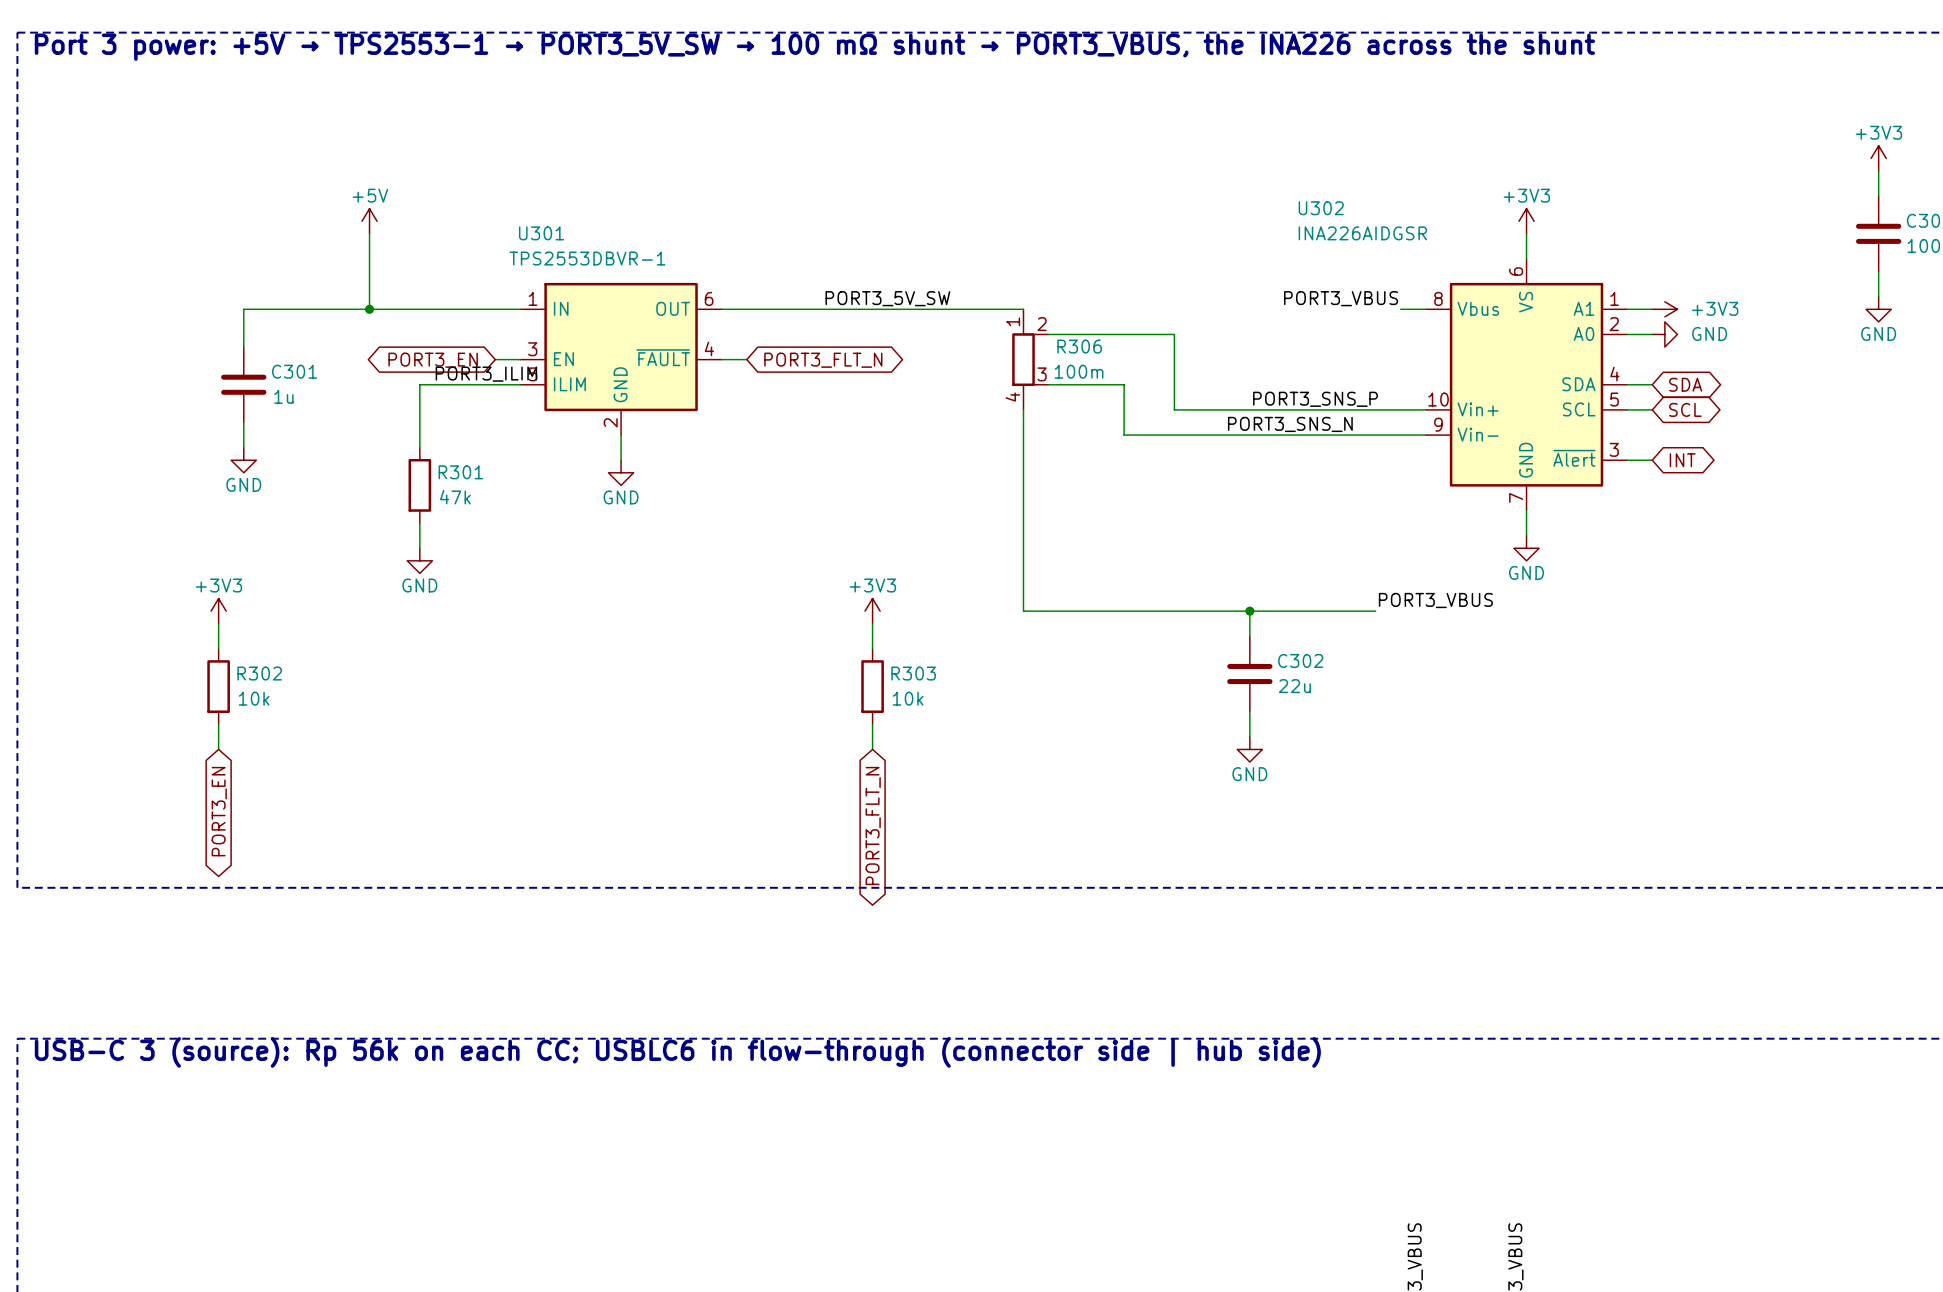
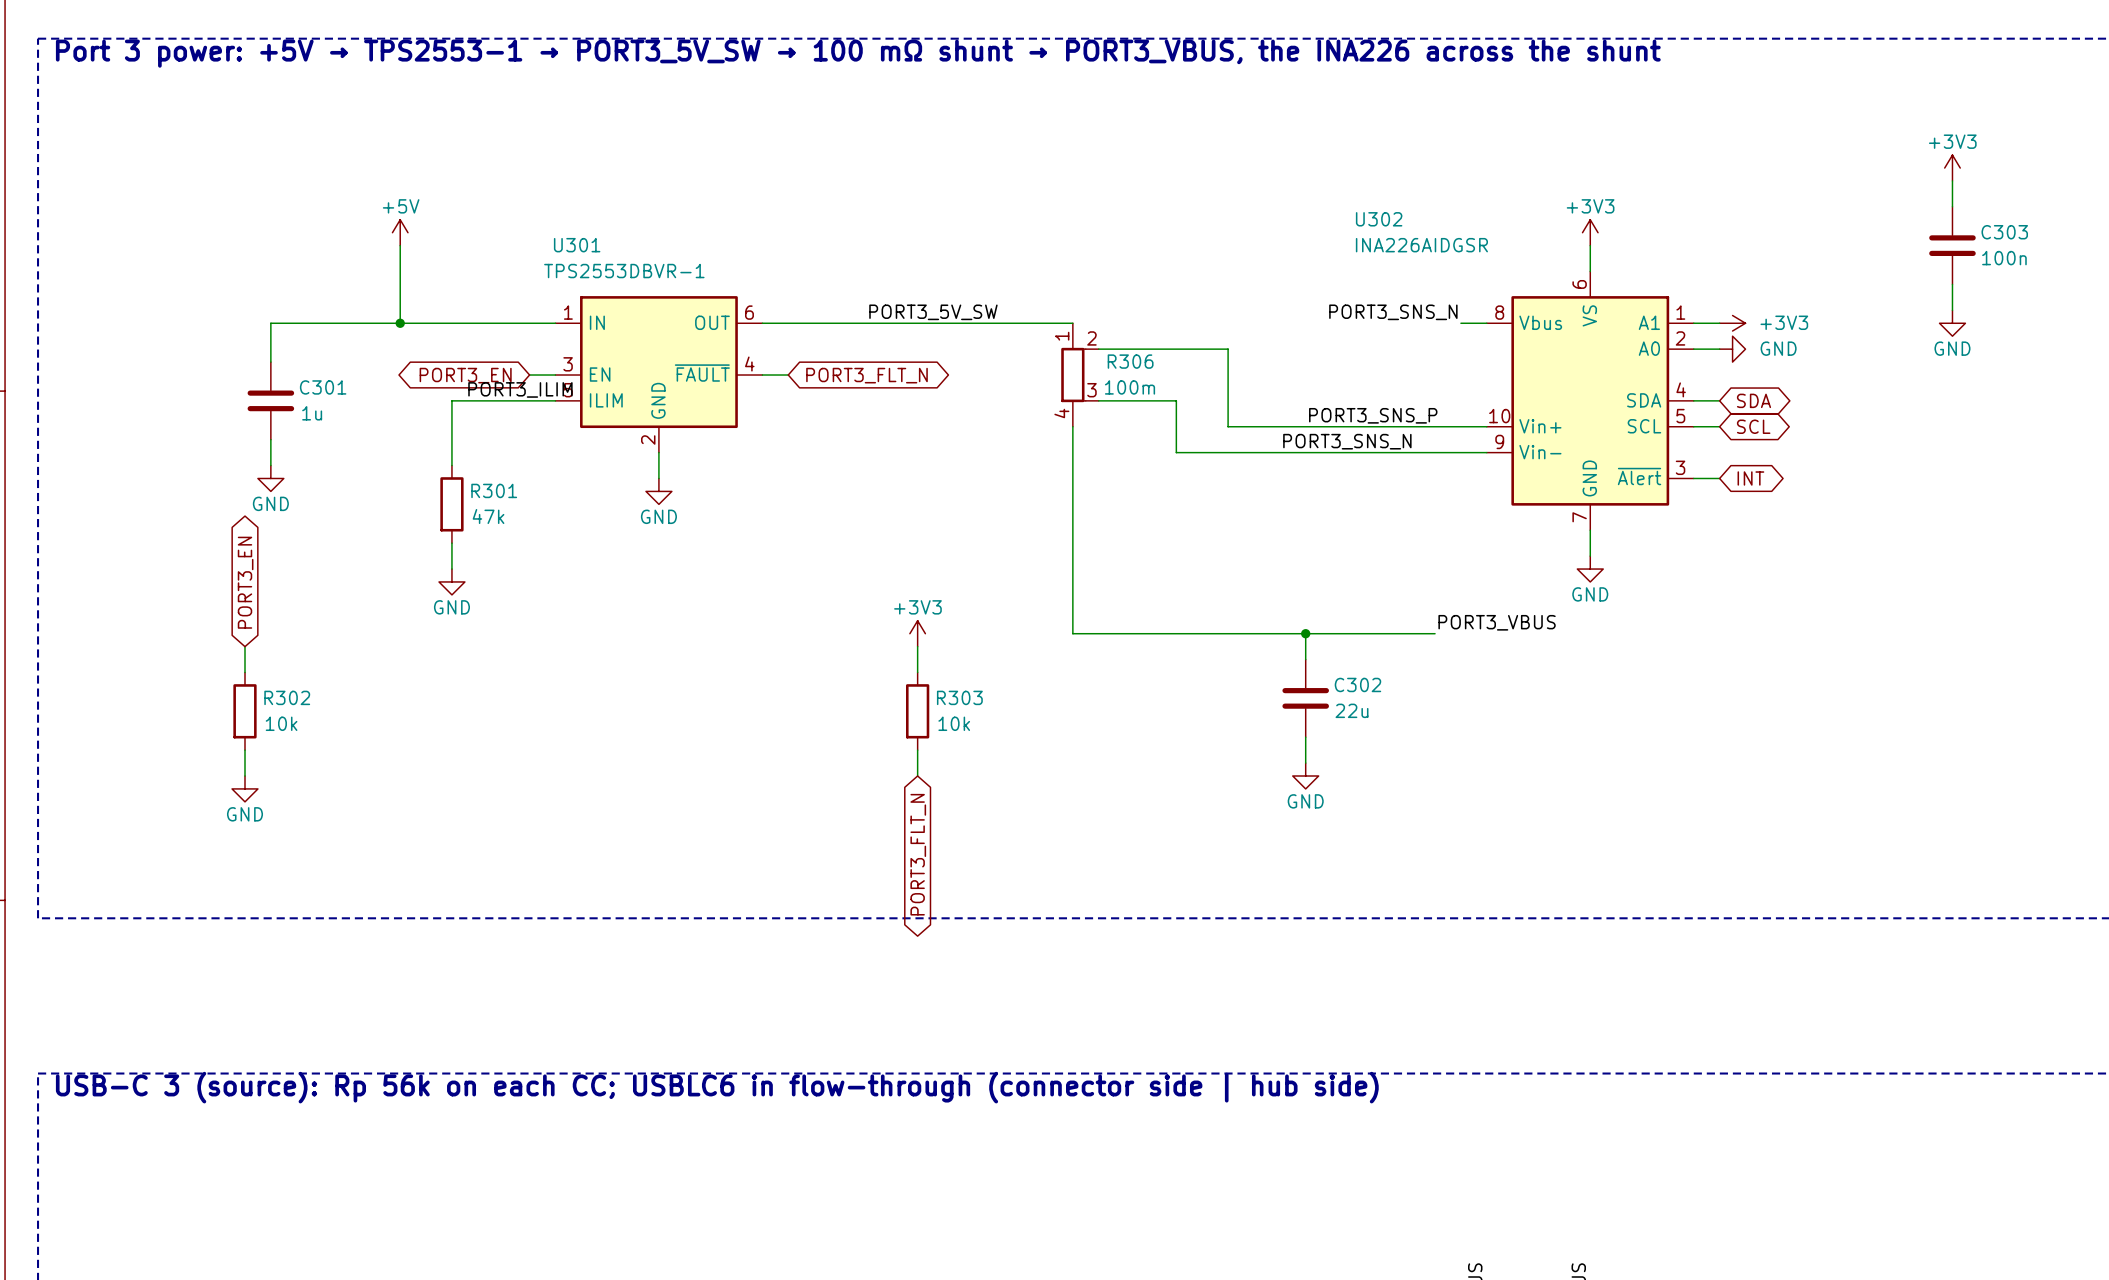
label: PORT3_VBUS (1341, 298) -> PORT3_SNS_N (1393, 312)
power symbol: +3V3 (218, 611) -> none
power symbol: none -> GND (244, 788)
global label rotation: 0° (219, 811) -> 180° (245, 582)
global label position: PORT3_EN (219, 811) -> PORT3_EN (245, 582)

